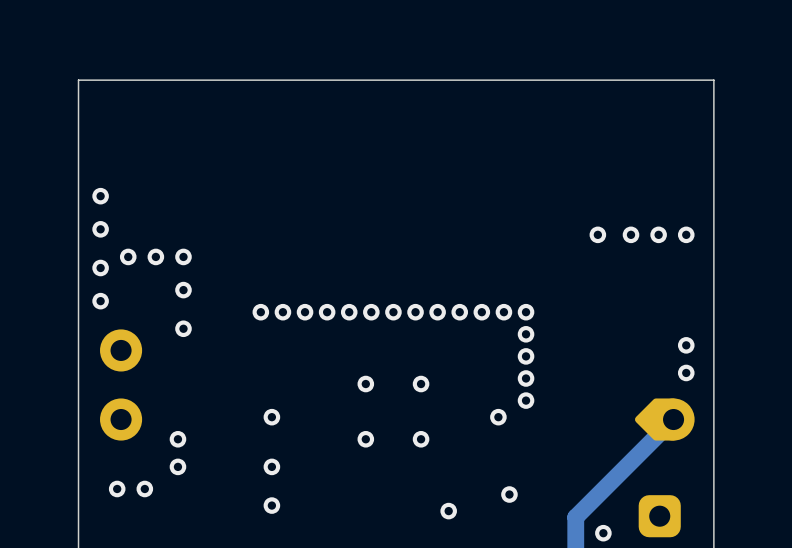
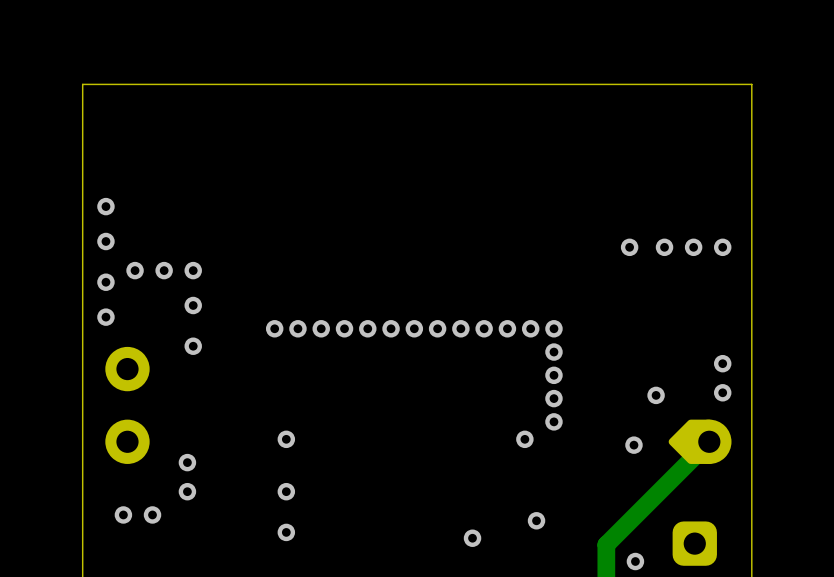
via: none -> (656, 395)
via: (365, 384) -> none
via: (421, 384) -> none
via: none -> (633, 445)
via: (365, 439) -> none
via: (421, 439) -> none

